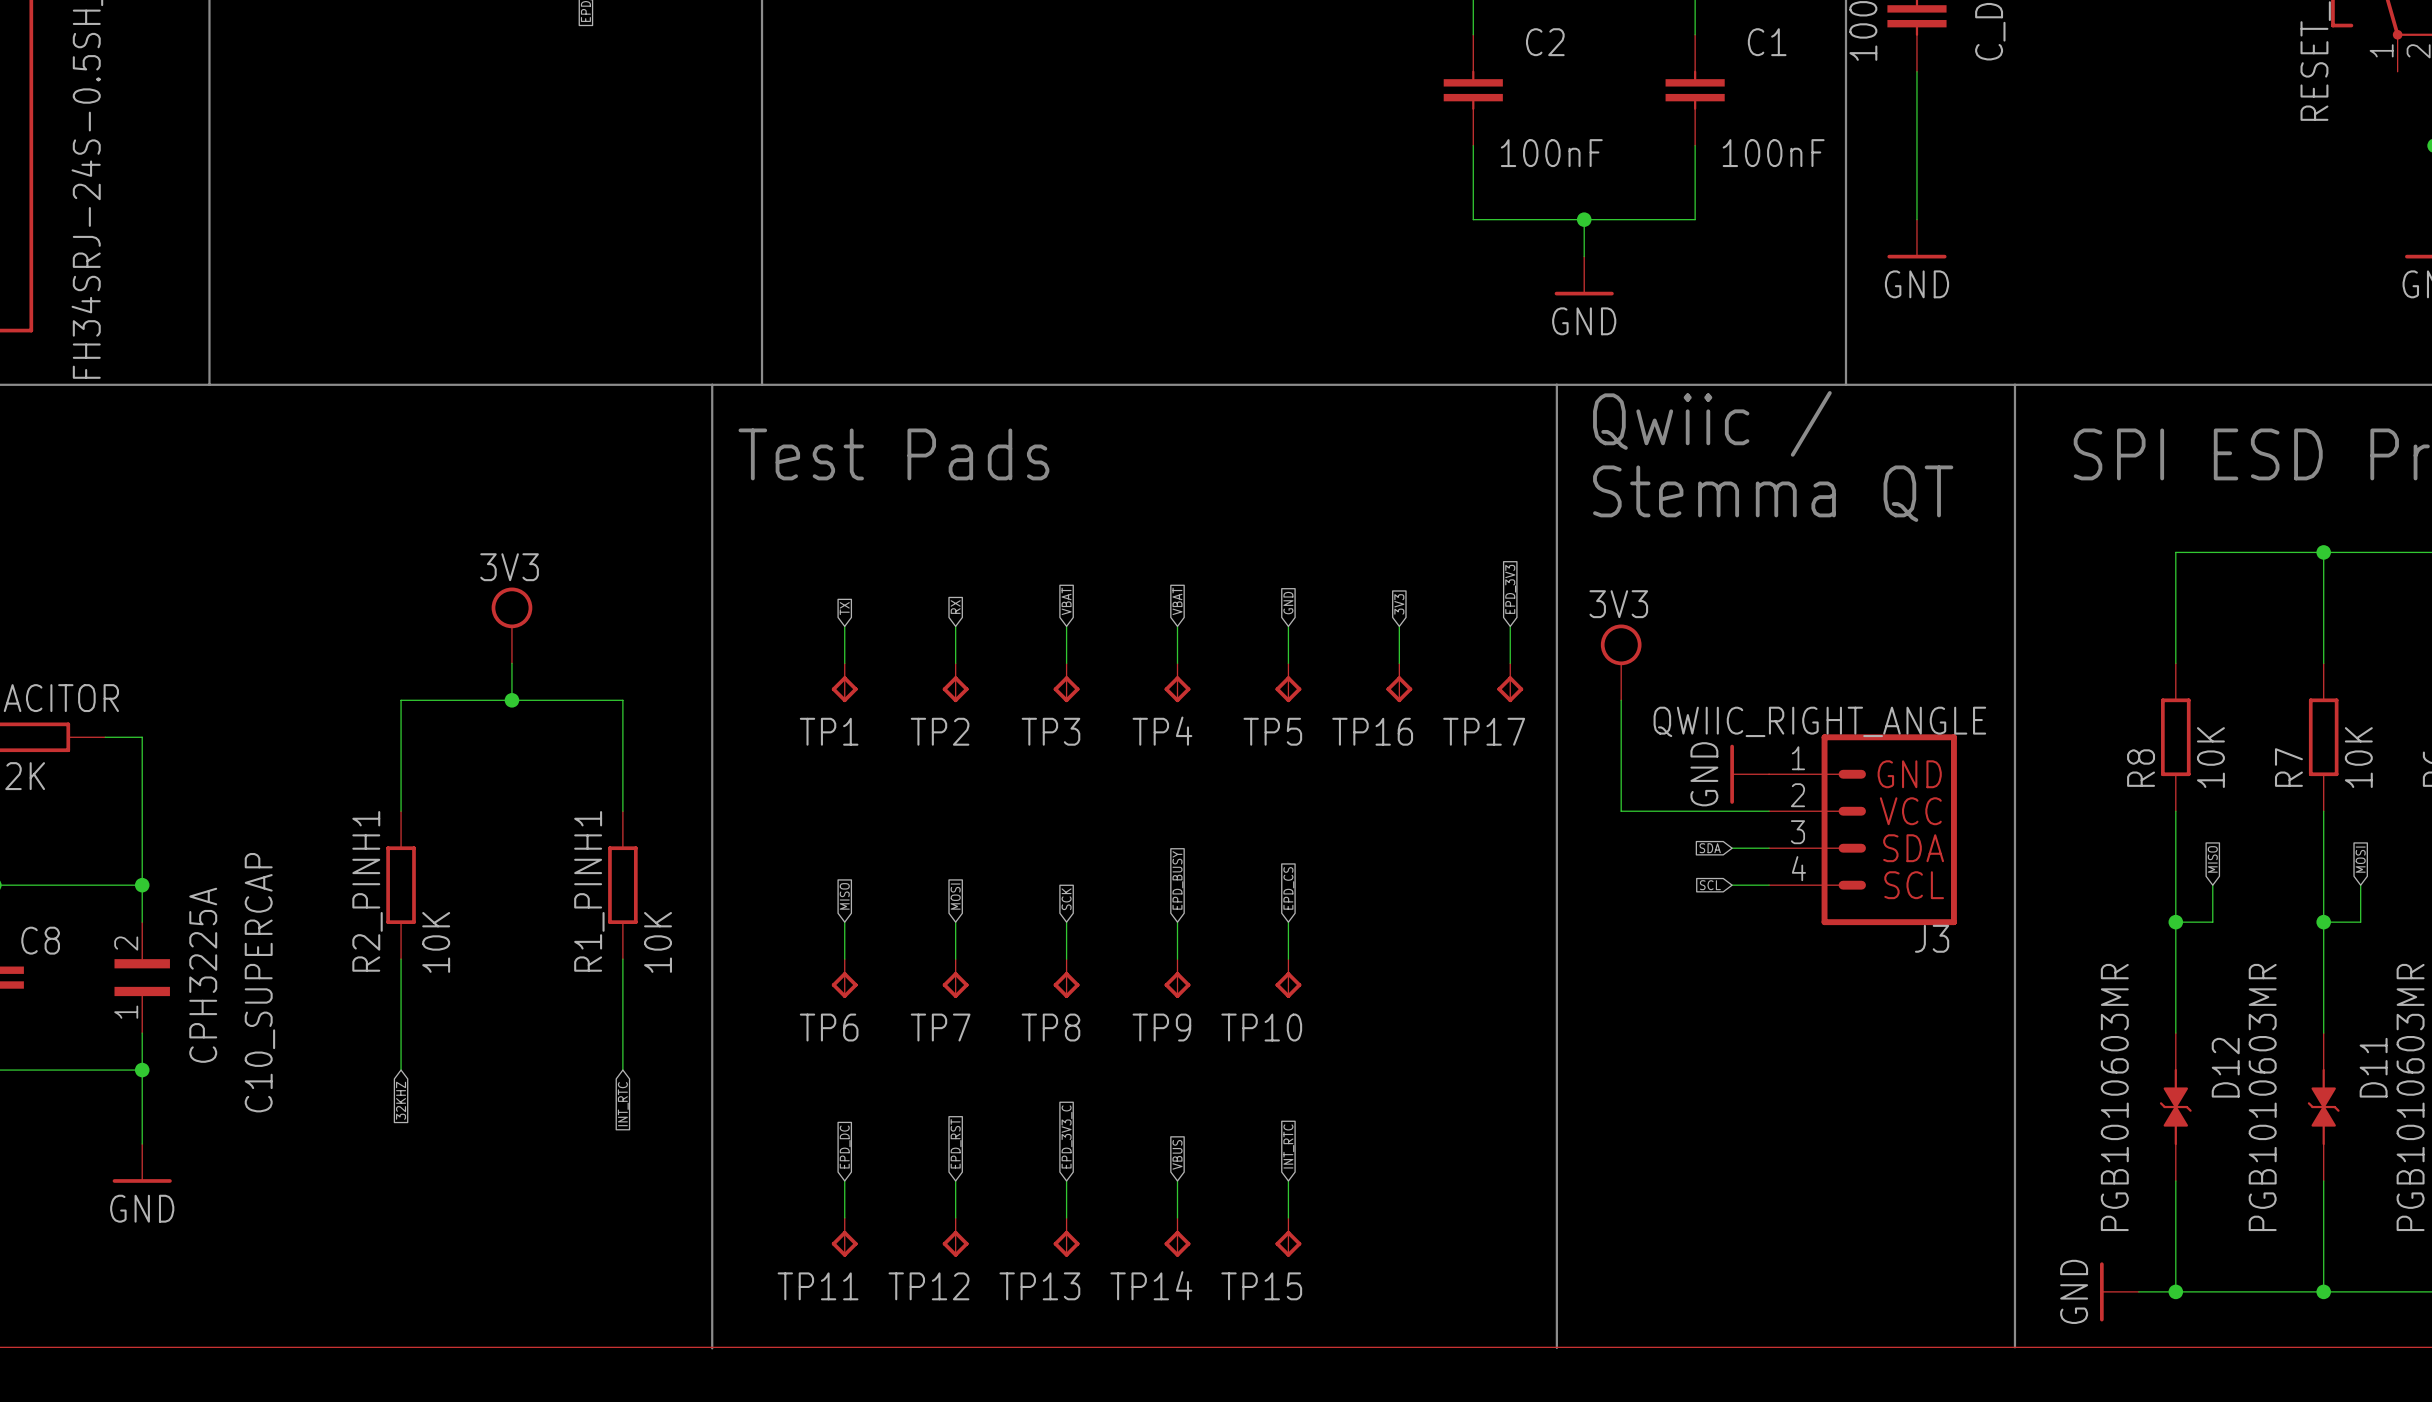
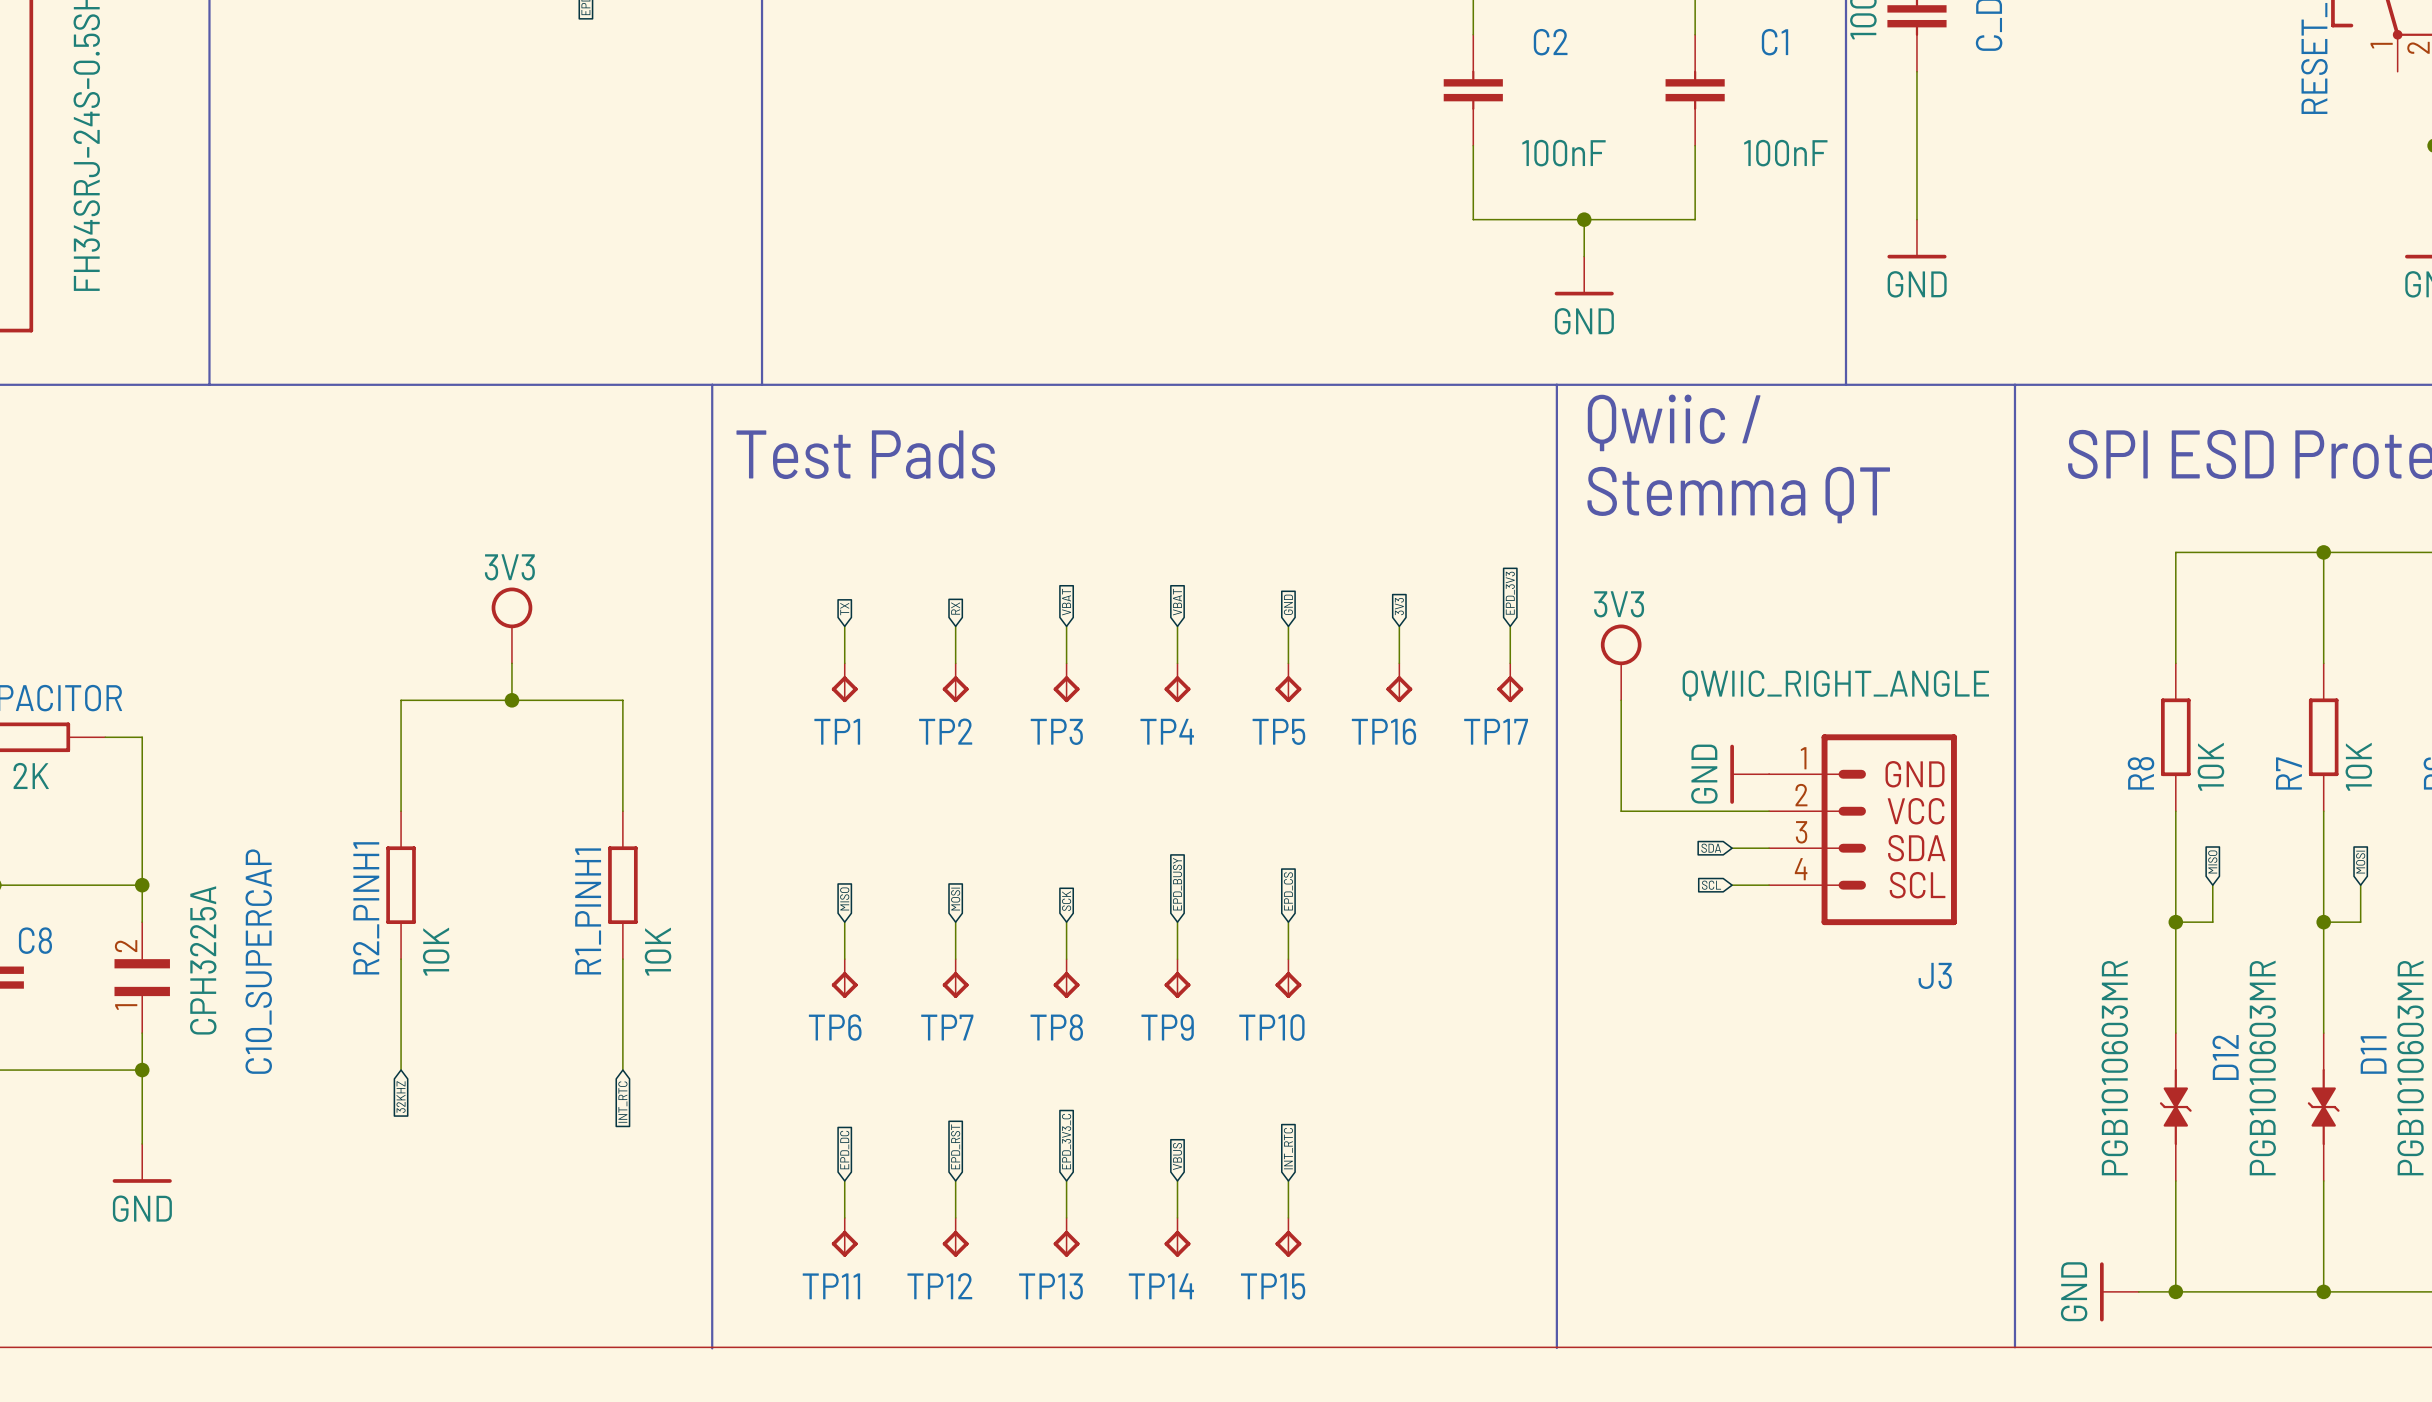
J3 value position: QWIIC_RIGHT_ANGLE (1819, 721) -> QWIIC_RIGHT_ANGLE (1835, 685)
J3 name position: J3 (1932, 938) -> J3 (1935, 975)

